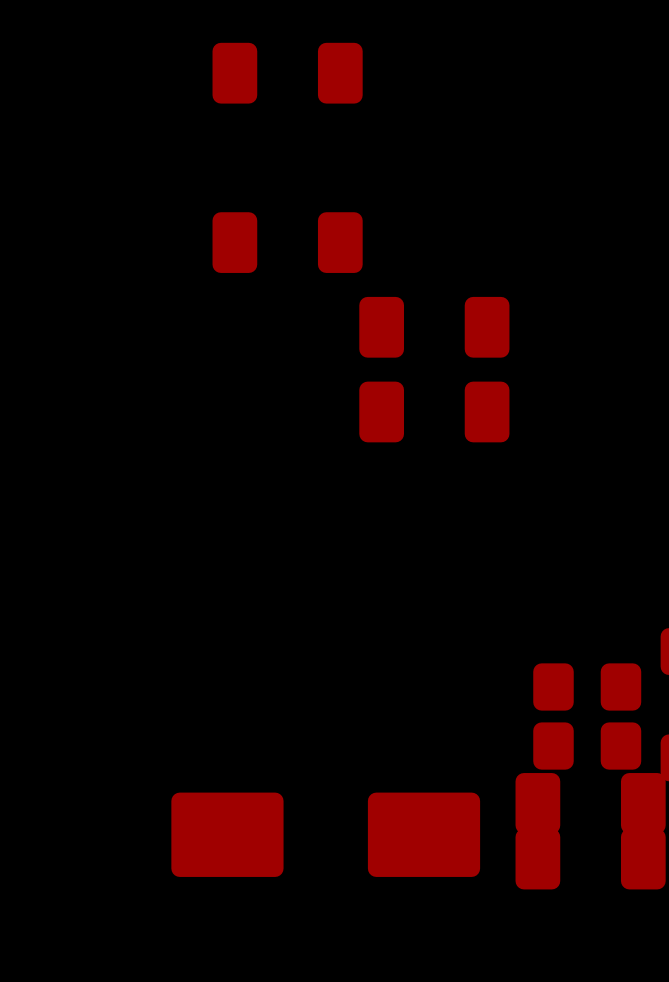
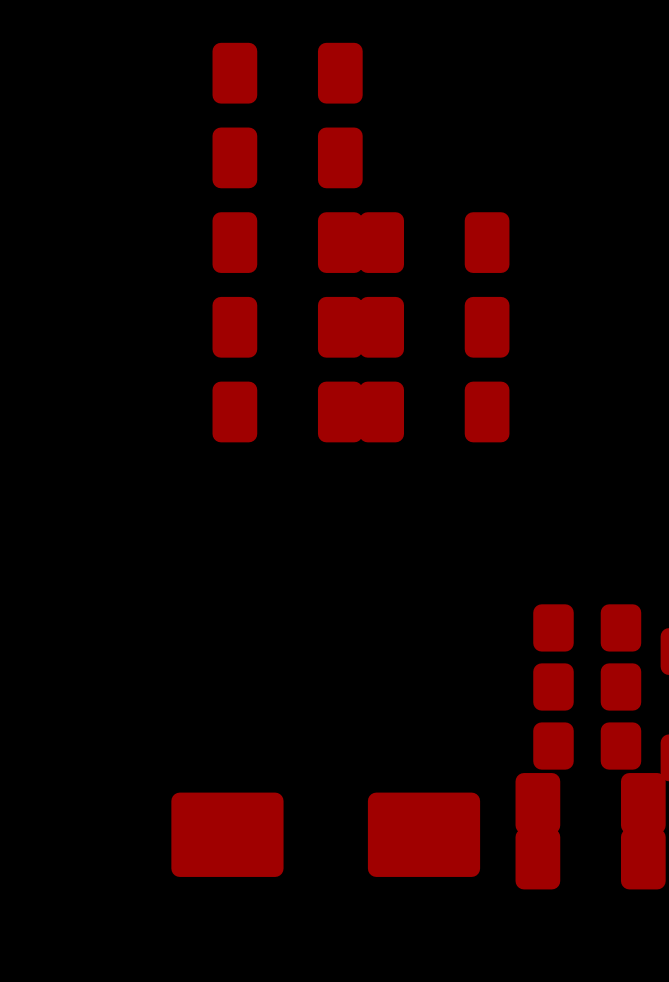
part: none -> (287, 157)
part: none -> (434, 242)
part: none -> (287, 327)
part: none -> (287, 411)
part: none -> (587, 627)

